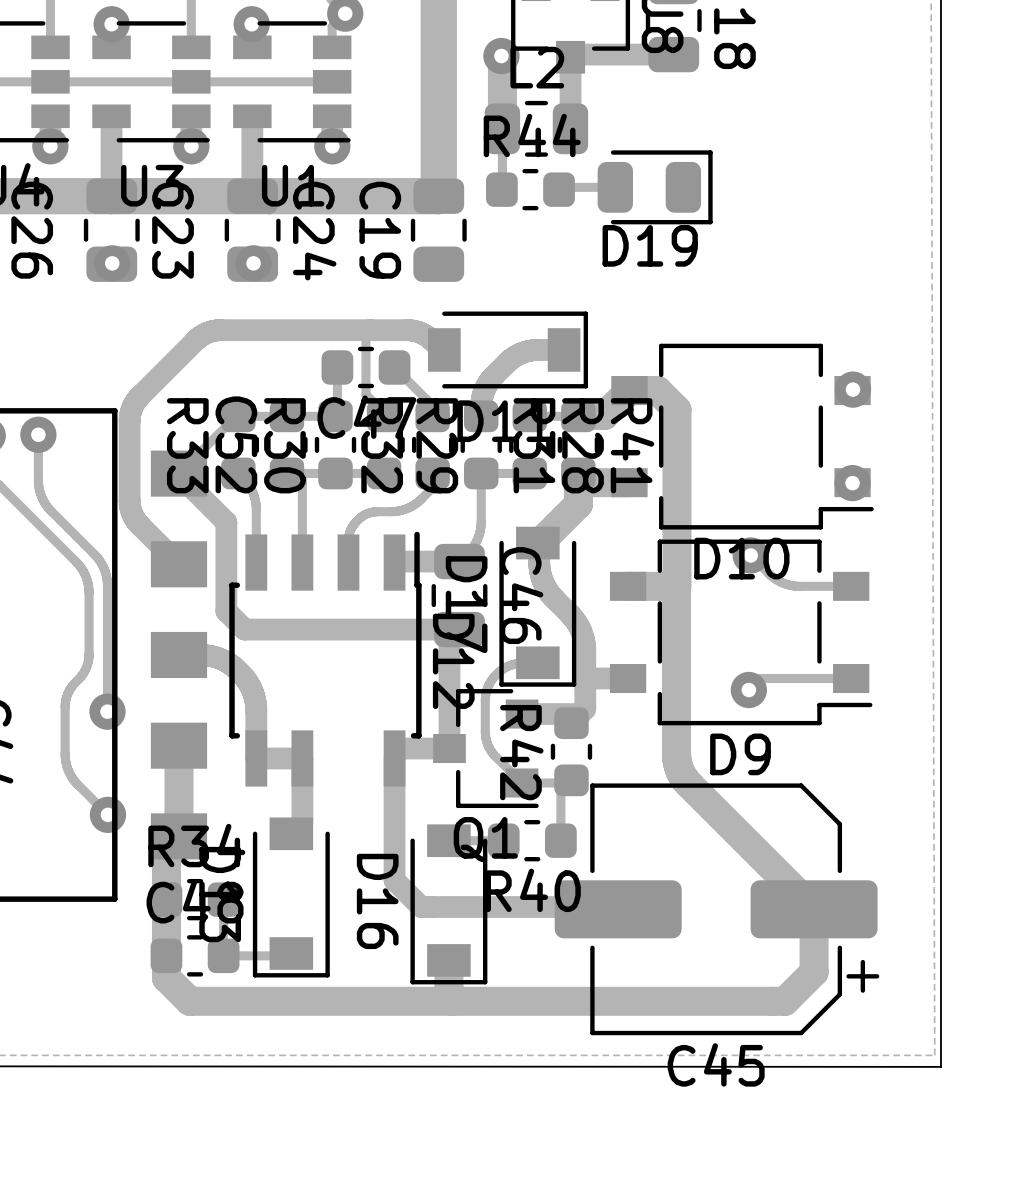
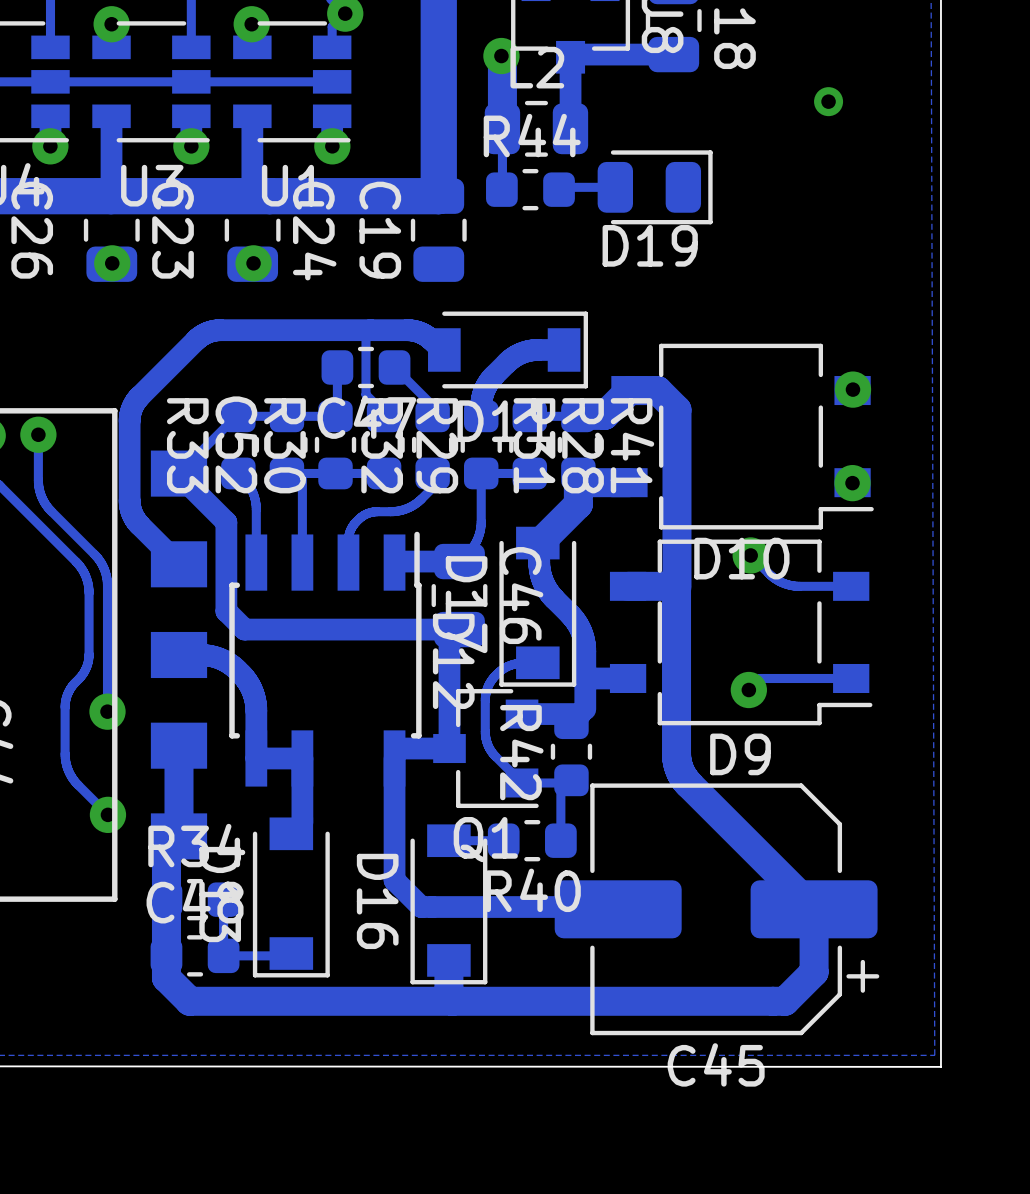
via: none -> (828, 101)

